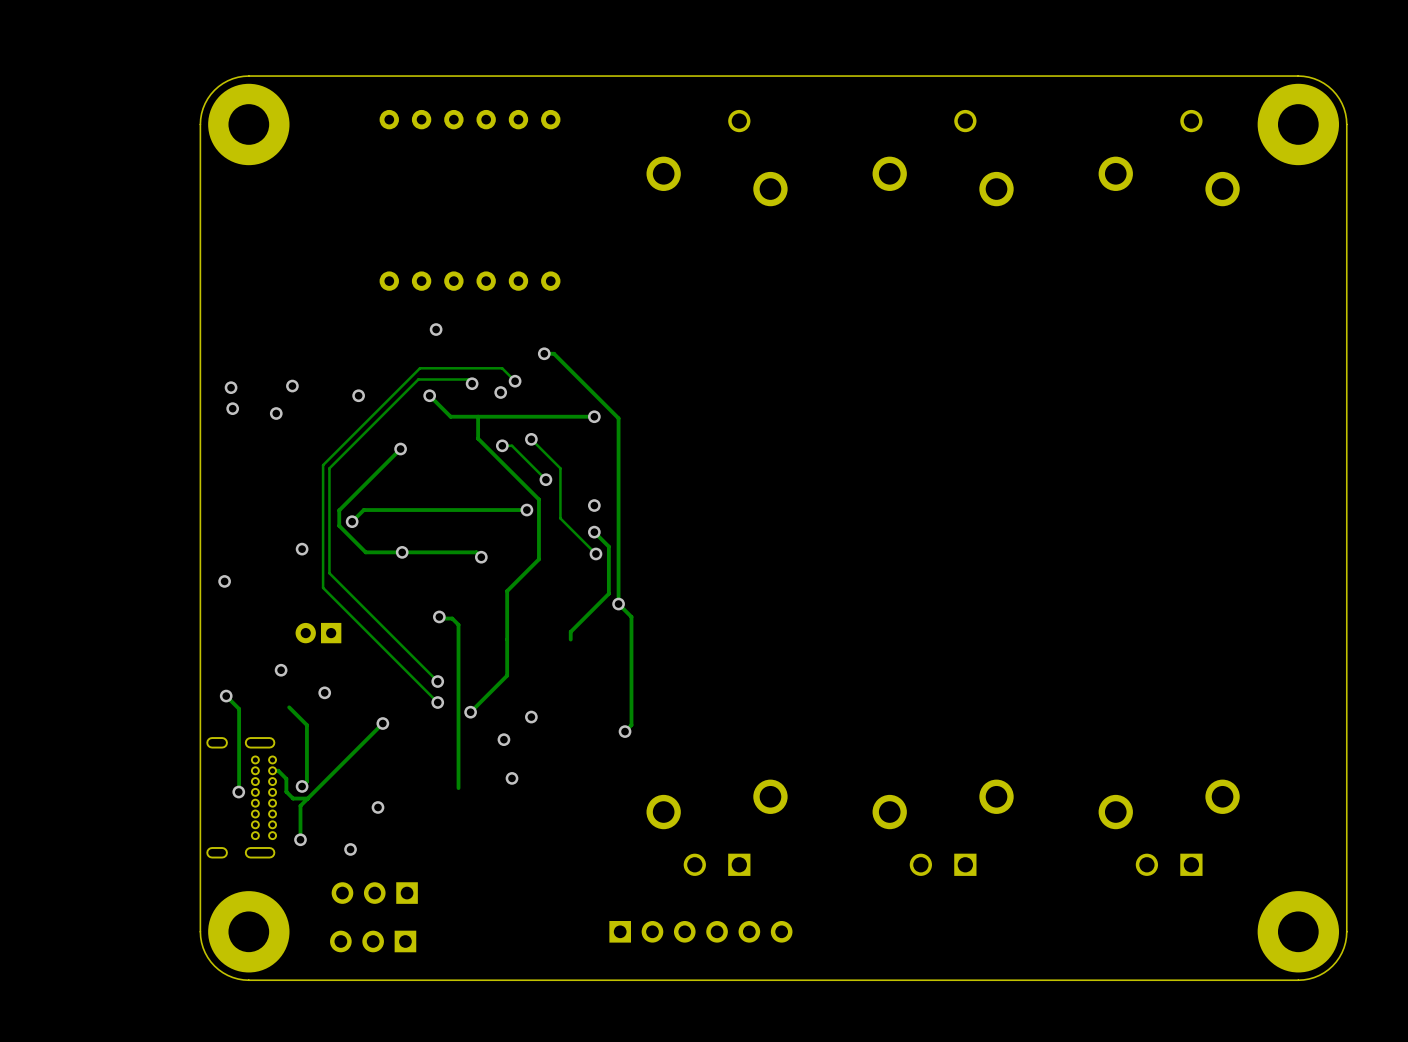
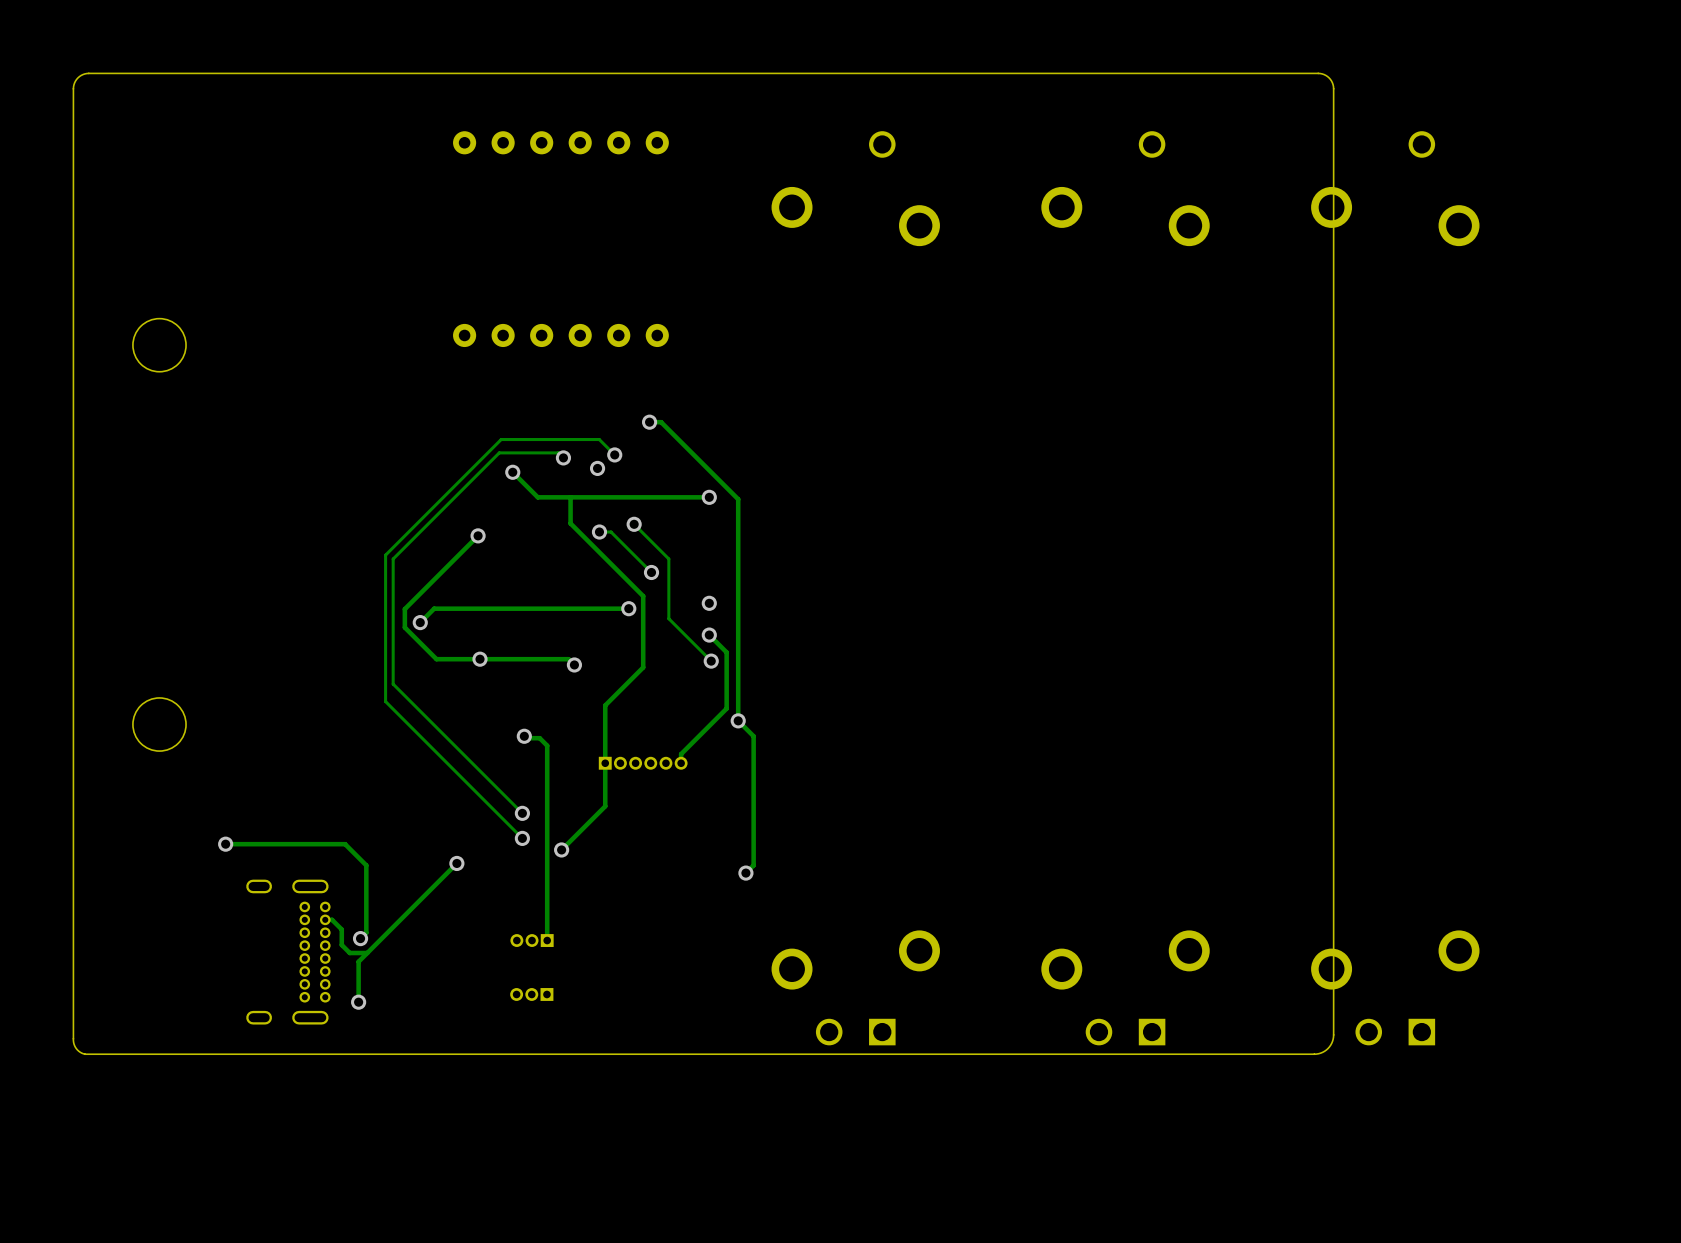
board edge: (1298, 76) (248, 76) (232, 78) (218, 86) (205, 103) (200, 124) (200, 931) (203, 947) (210, 962) (227, 975) (248, 980) (1298, 980) (1314, 977) (1328, 969) (1341, 952) (1346, 931) (1346, 124) (1344, 108) (1332, 90) (1319, 80) (1298, 76) -> (1318, 73) (1329, 77) (1333, 88) (1333, 1034) (1331, 1043) (1326, 1050) (1314, 1054) (84, 1054) (76, 1048) (73, 1040) (73, 88) (74, 82) (79, 76) (88, 73) (1318, 73)
part: (248, 124) -> none
part: (1298, 124) -> none
round board edge: none -> [132, 317, 187, 373]
via: (436, 329) -> none
via: (292, 386) -> none
via: (231, 387) -> none
via: (358, 395) -> none
via: (232, 408) -> none
via: (276, 413) -> none
via: (302, 549) -> none
via: (224, 581) -> none
round board edge: none -> [132, 697, 187, 752]
part: (318, 633) -> none
part: none -> (643, 763)
via: (281, 670) -> none
via: (324, 692) -> none
track: (226, 696) (239, 708) (238, 792) -> none
via position: (226, 696) -> (225, 844)
track: none -> (345, 844) (225, 844)
via: (531, 717) -> none
via: (503, 739) -> none
via: (512, 778) -> none
part: none -> (532, 940)
via: (238, 792) -> none
via: (377, 807) -> none
part: none -> (531, 994)
via: (350, 849) -> none
part: (374, 893) -> none
part: (248, 931) -> none
part: (700, 931) -> none
part: (1298, 931) -> none
part: (373, 941) -> none

